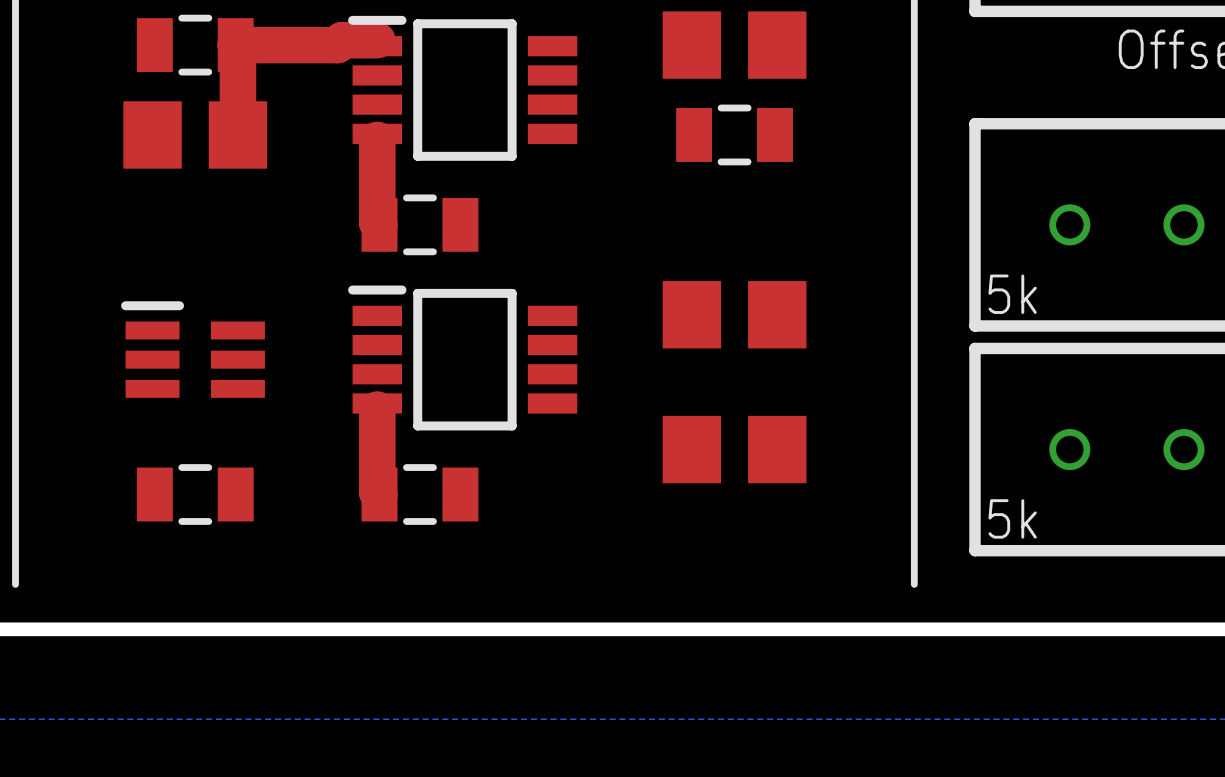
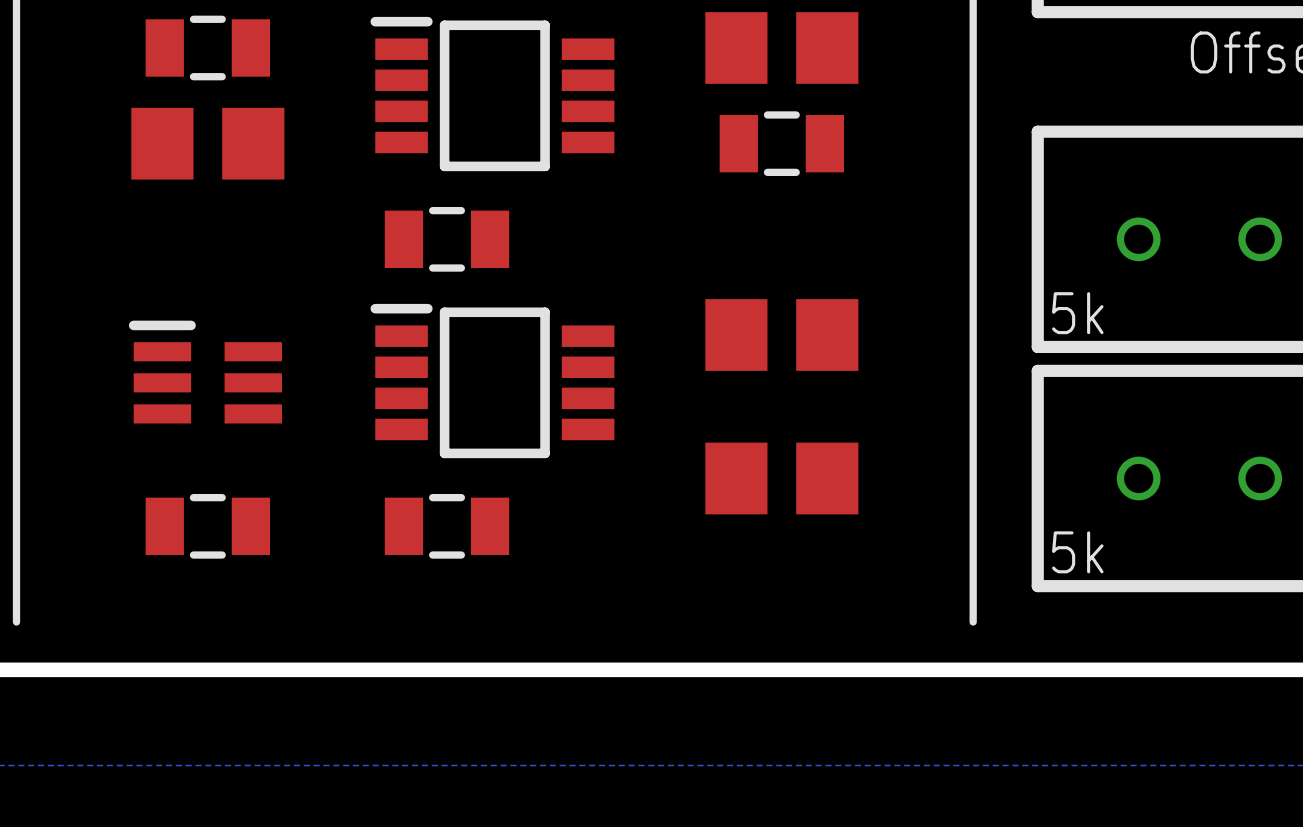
top track: (377, 40) (342, 40) (337, 45) (235, 45) (237, 47) (237, 134) -> none
top track: (377, 139) (377, 222) (379, 224) -> none
top track: (377, 409) (377, 492) (379, 494) -> none

